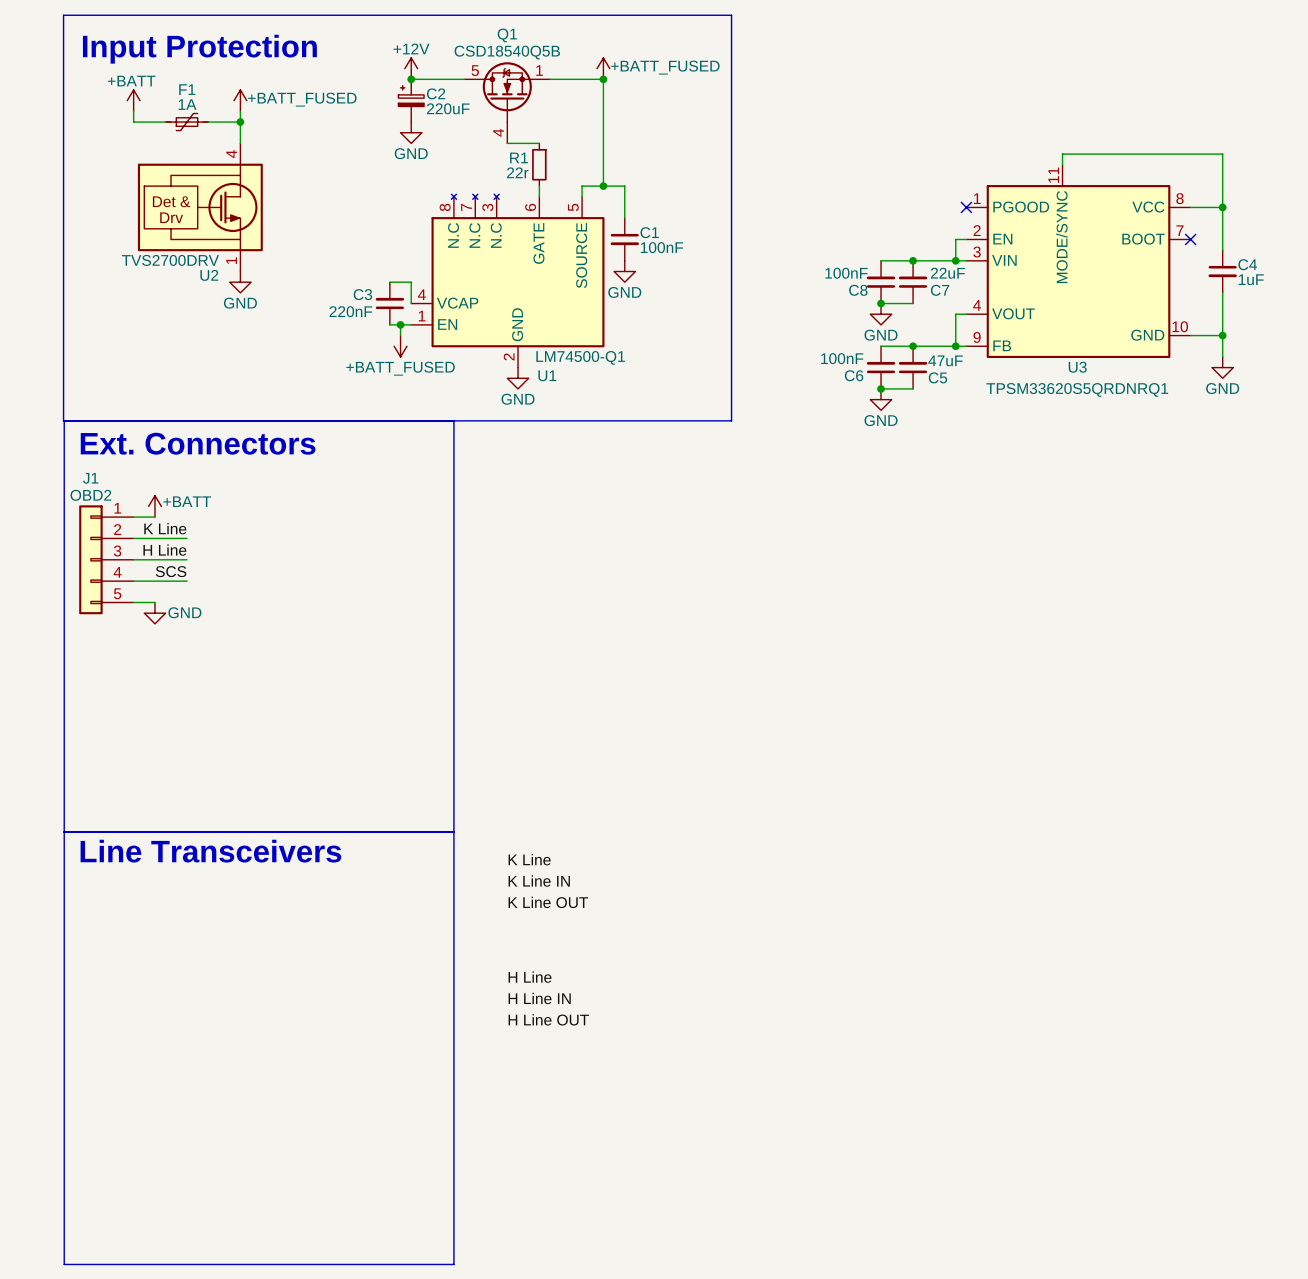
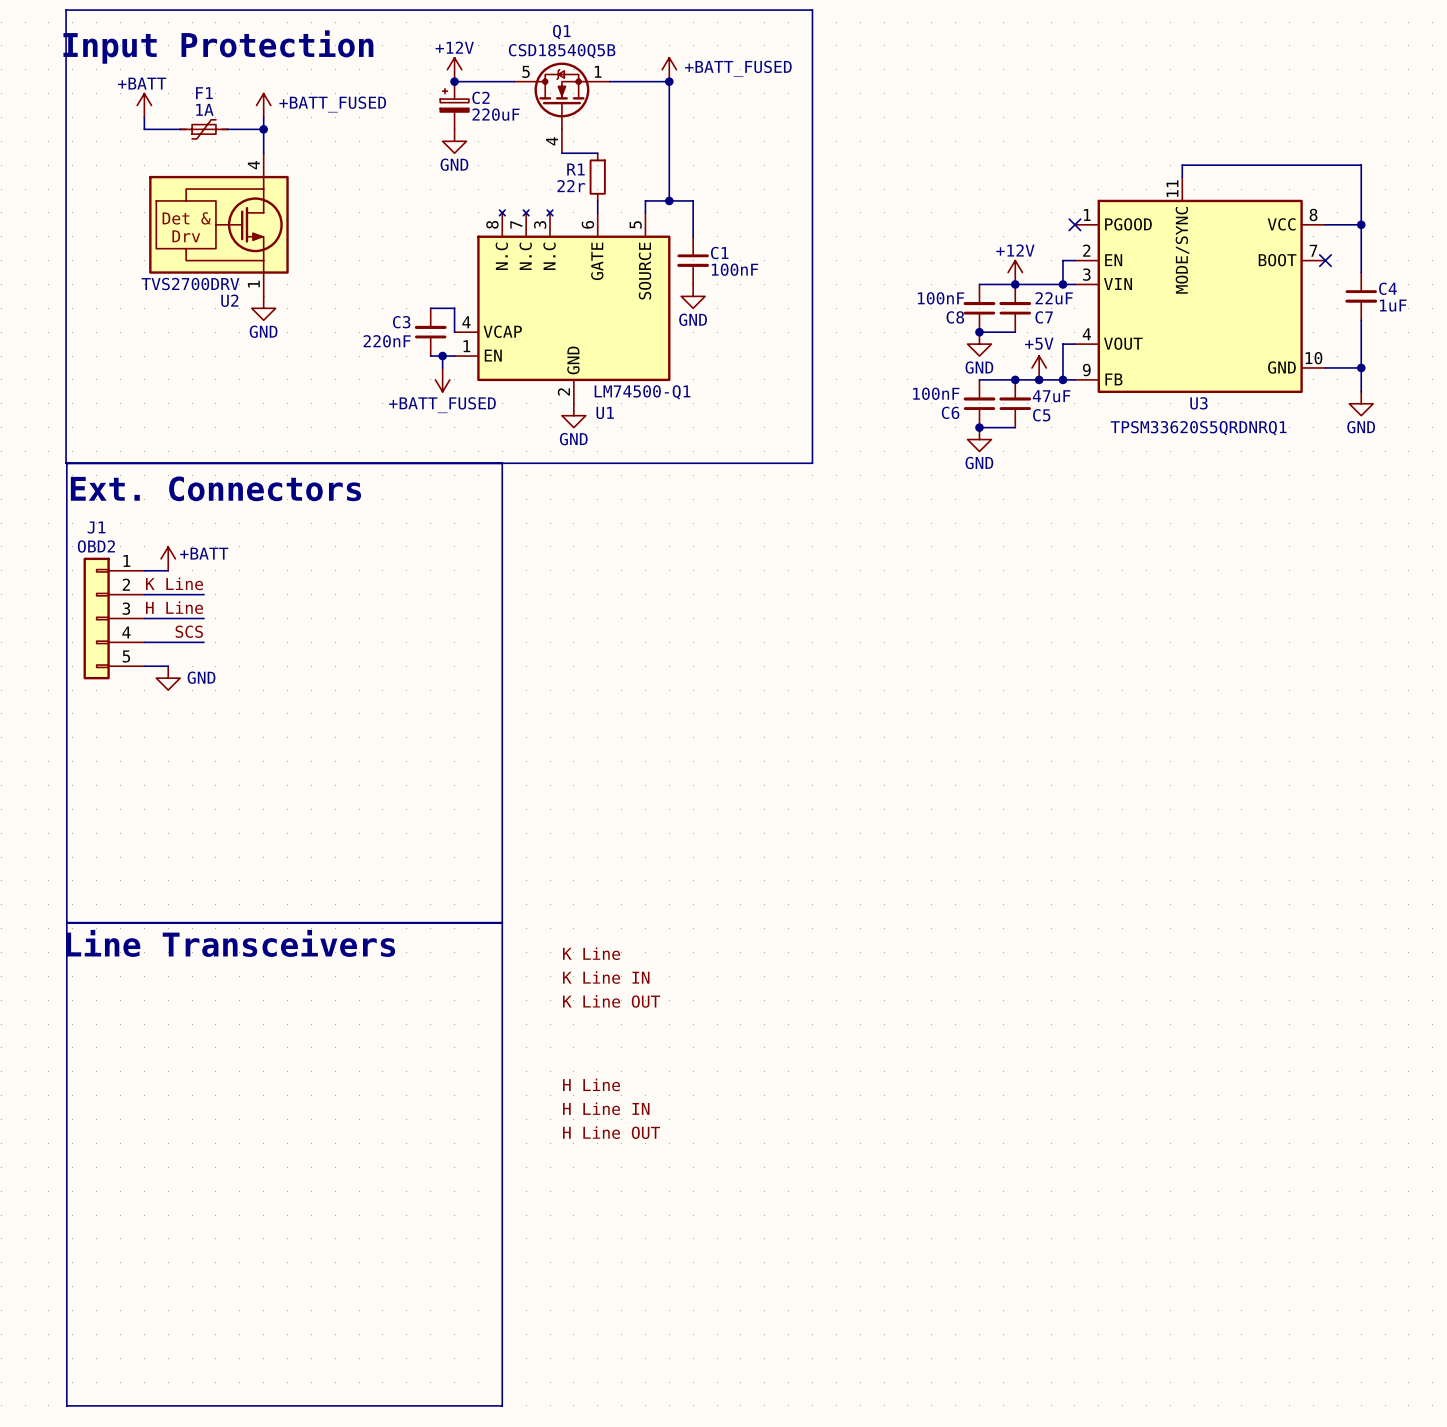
power symbol: none -> +12V (1015, 272)
power symbol: none -> +5V (1039, 367)
junction: none -> (1039, 379)

